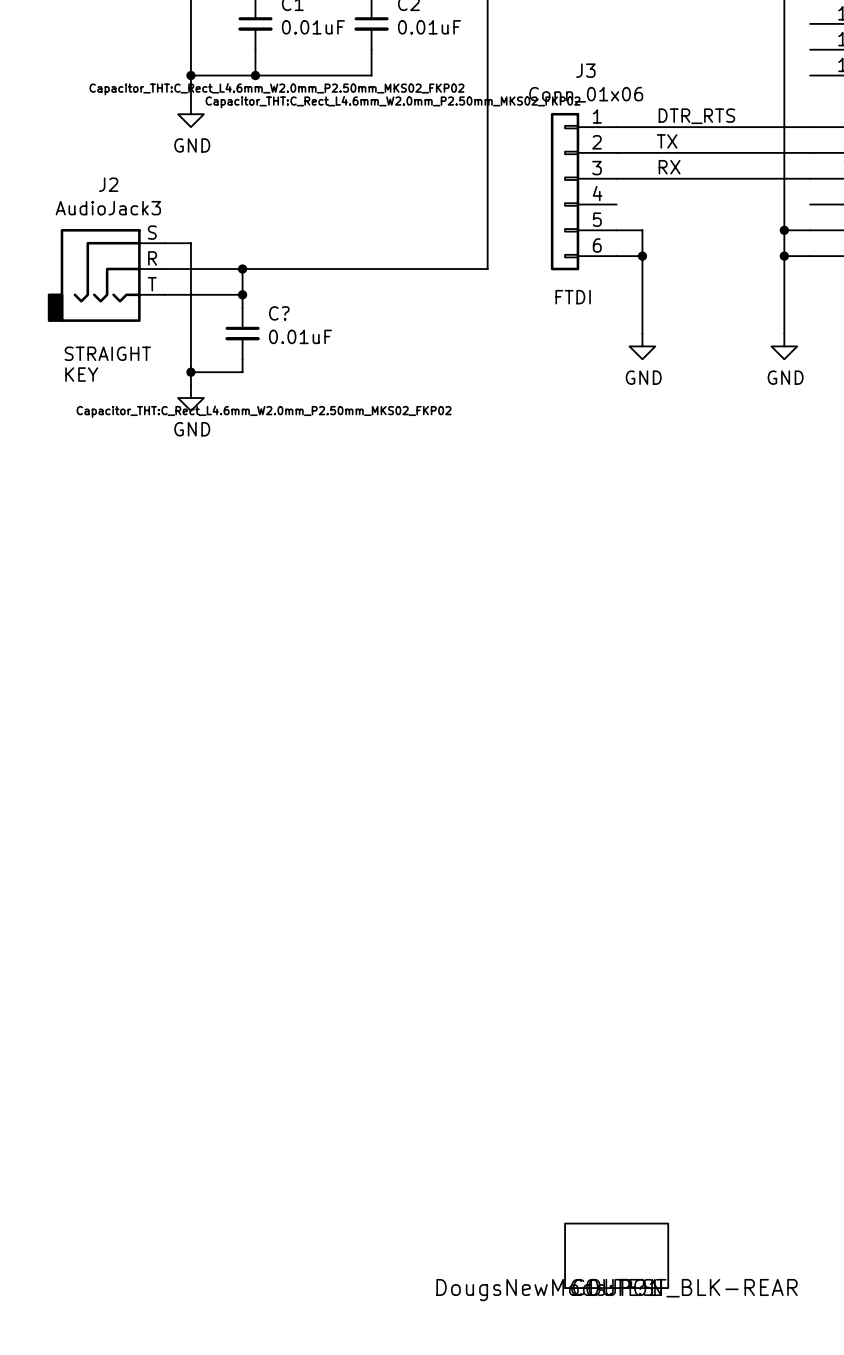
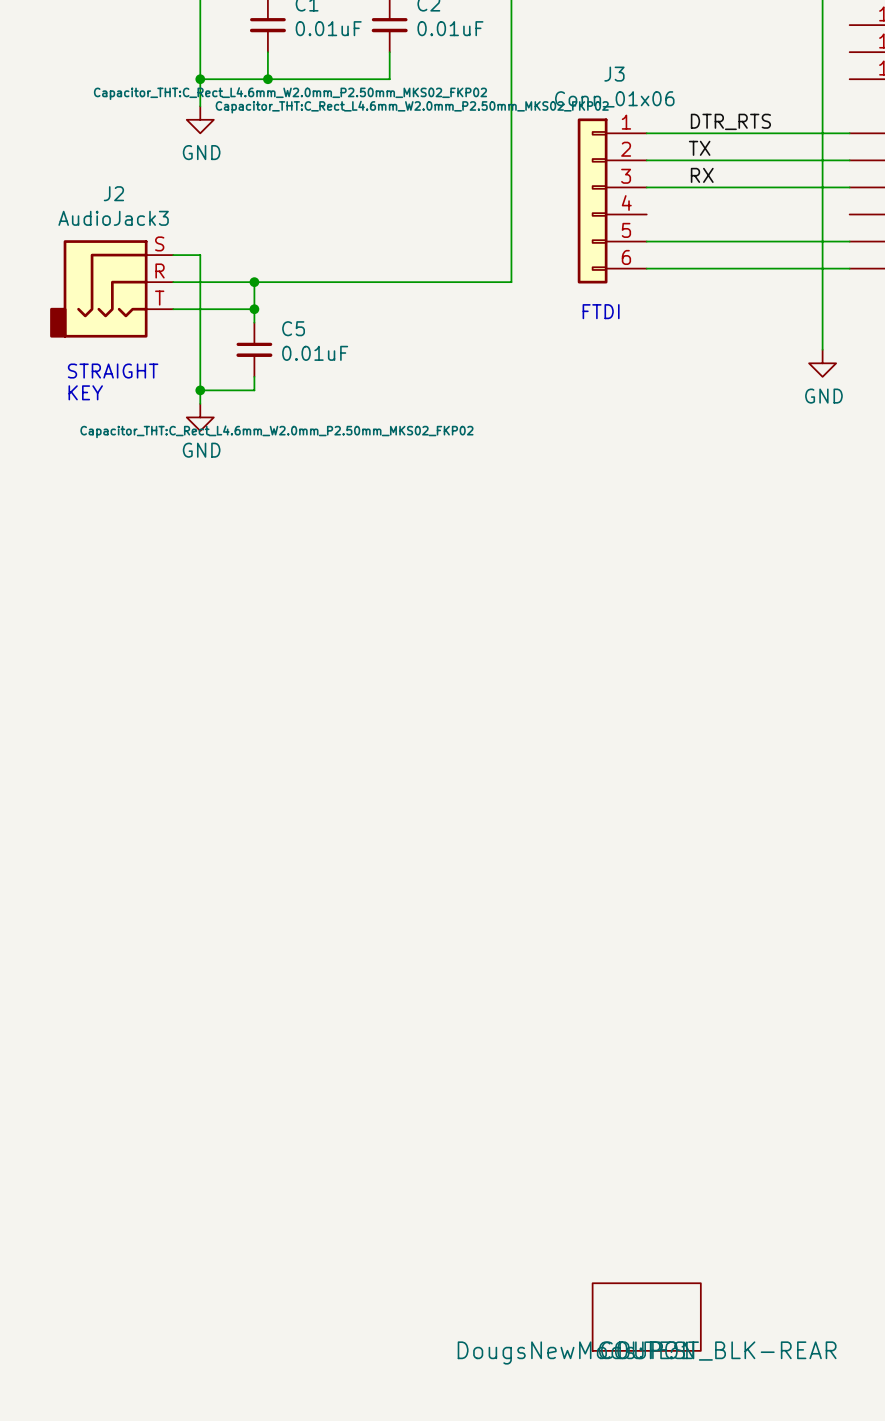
wire: (642, 230) (642, 333) -> (673, 241) (822, 241)
junction: (784, 230) -> none
wire: none -> (673, 268) (822, 268)
junction: (642, 256) -> none
junction: (784, 256) -> none
C? name: C? (279, 313) -> C5 (293, 328)
power symbol: GND (642, 346) -> none

